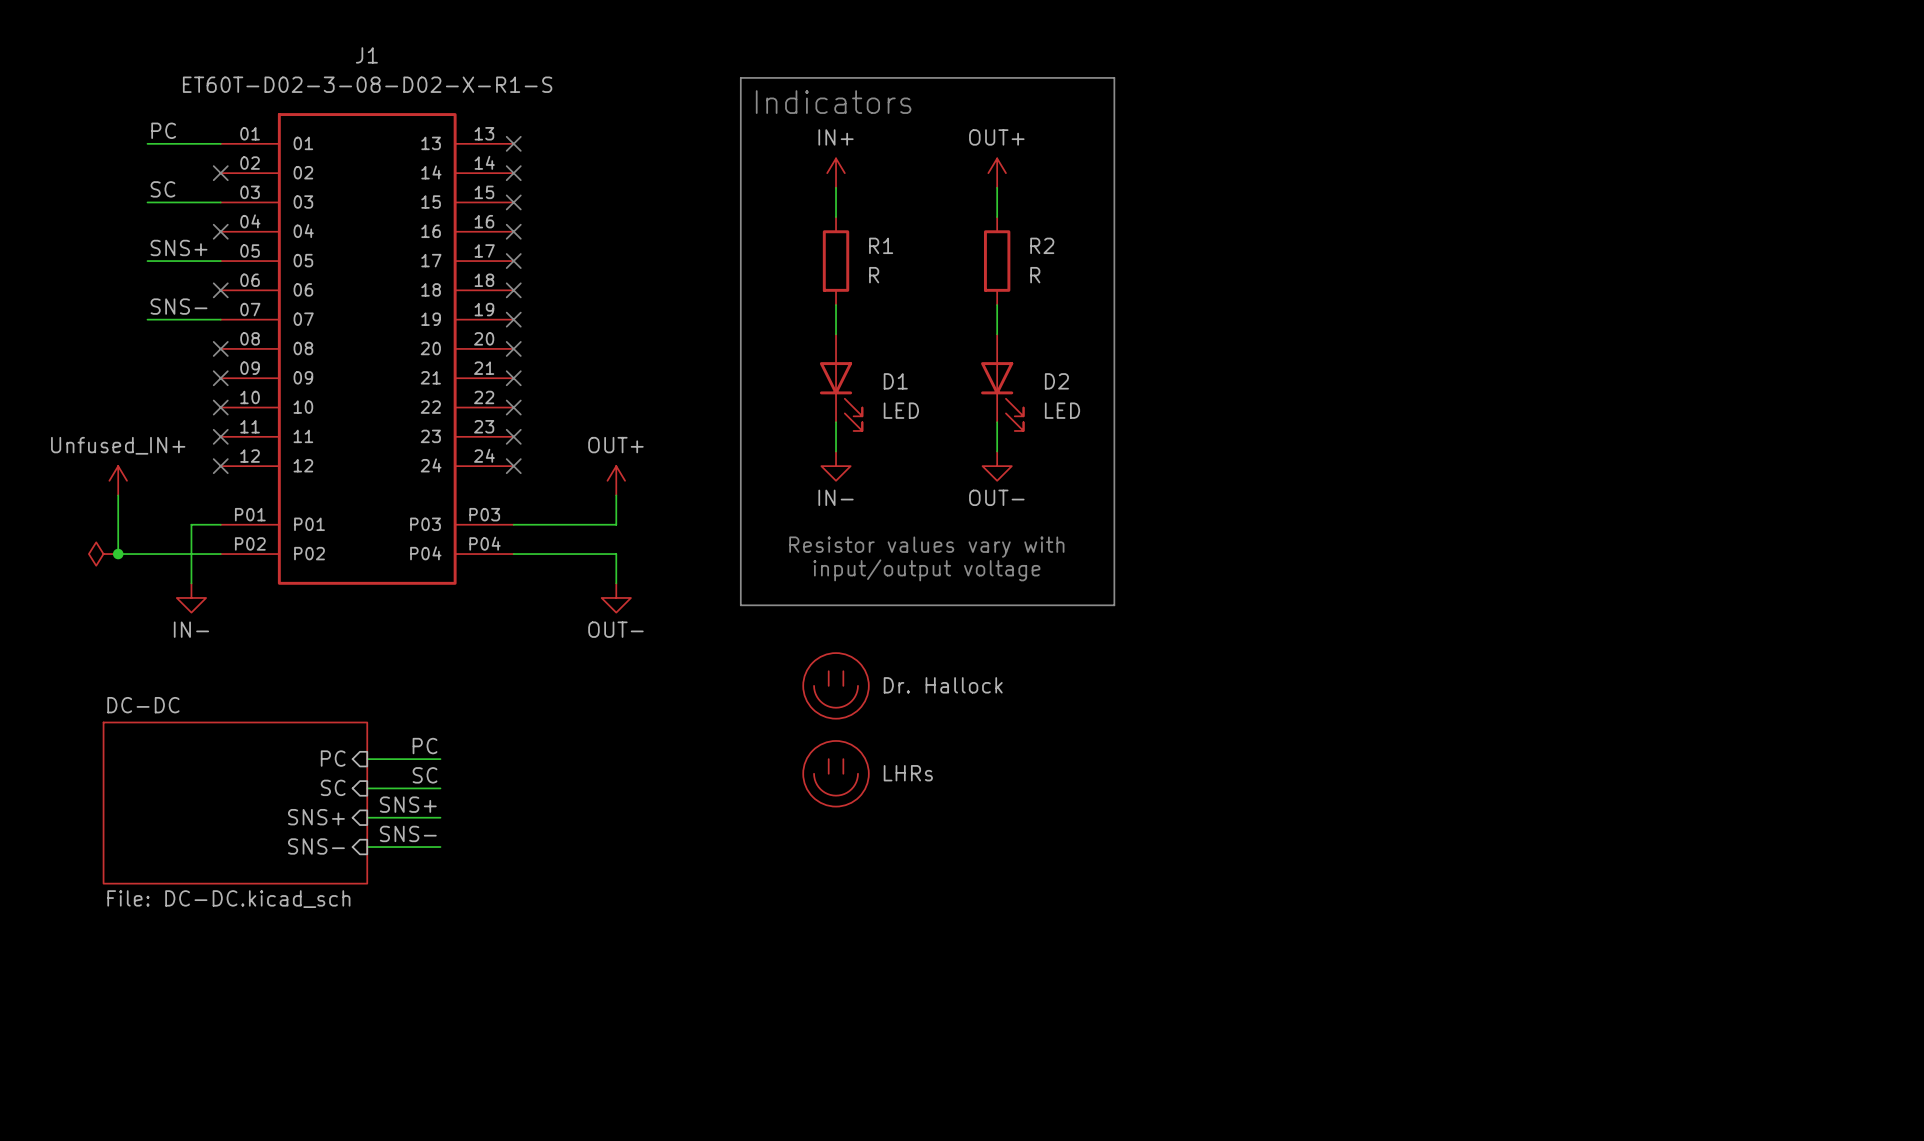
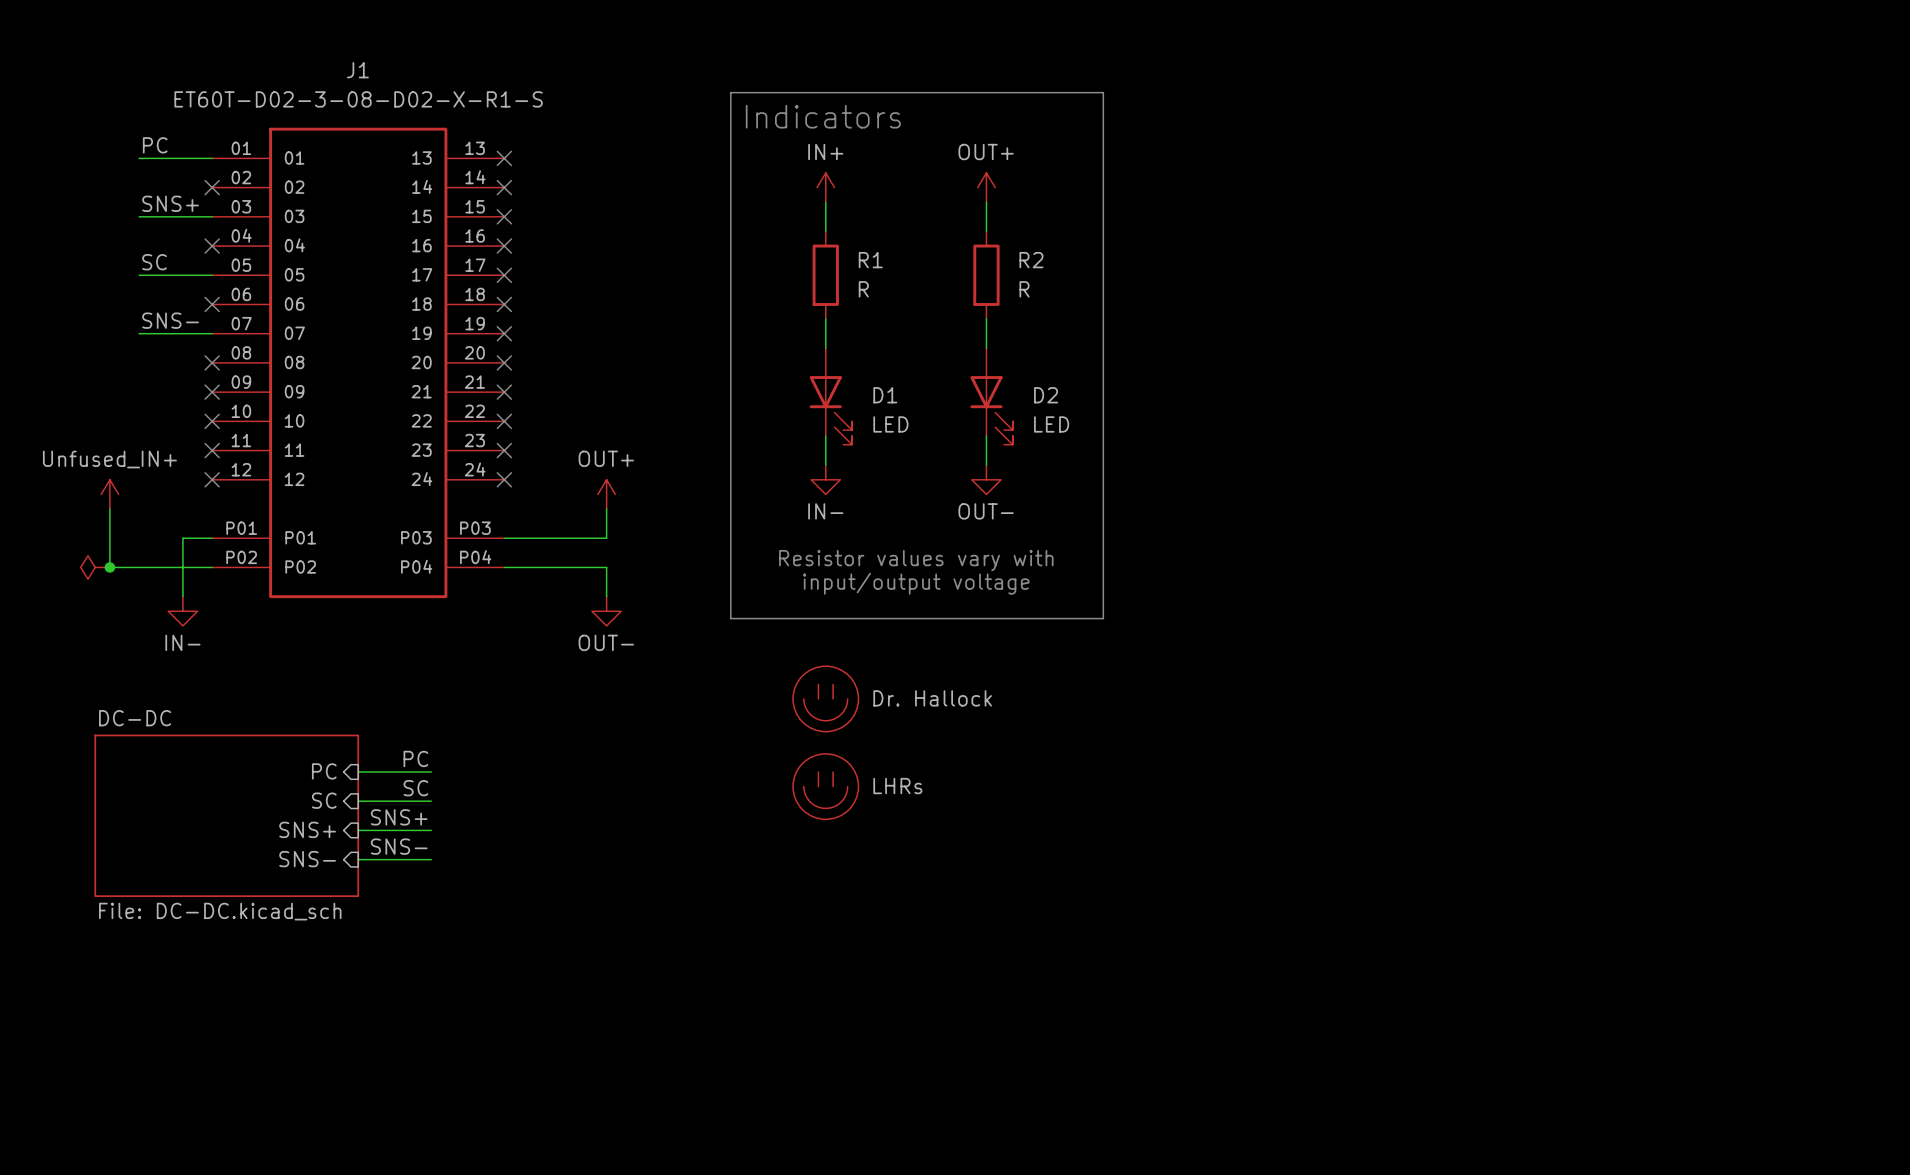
label: SC (162, 189) -> SNS+ (170, 203)
label: SNS+ (179, 247) -> SC (154, 262)

